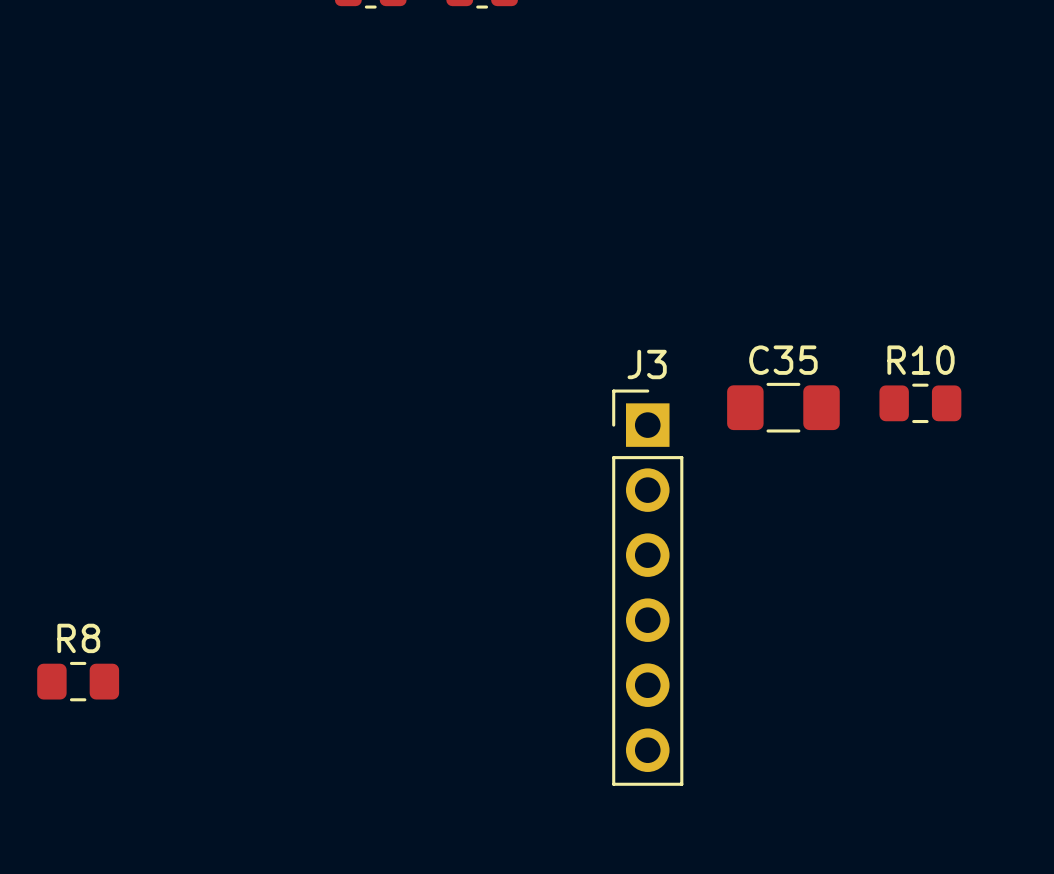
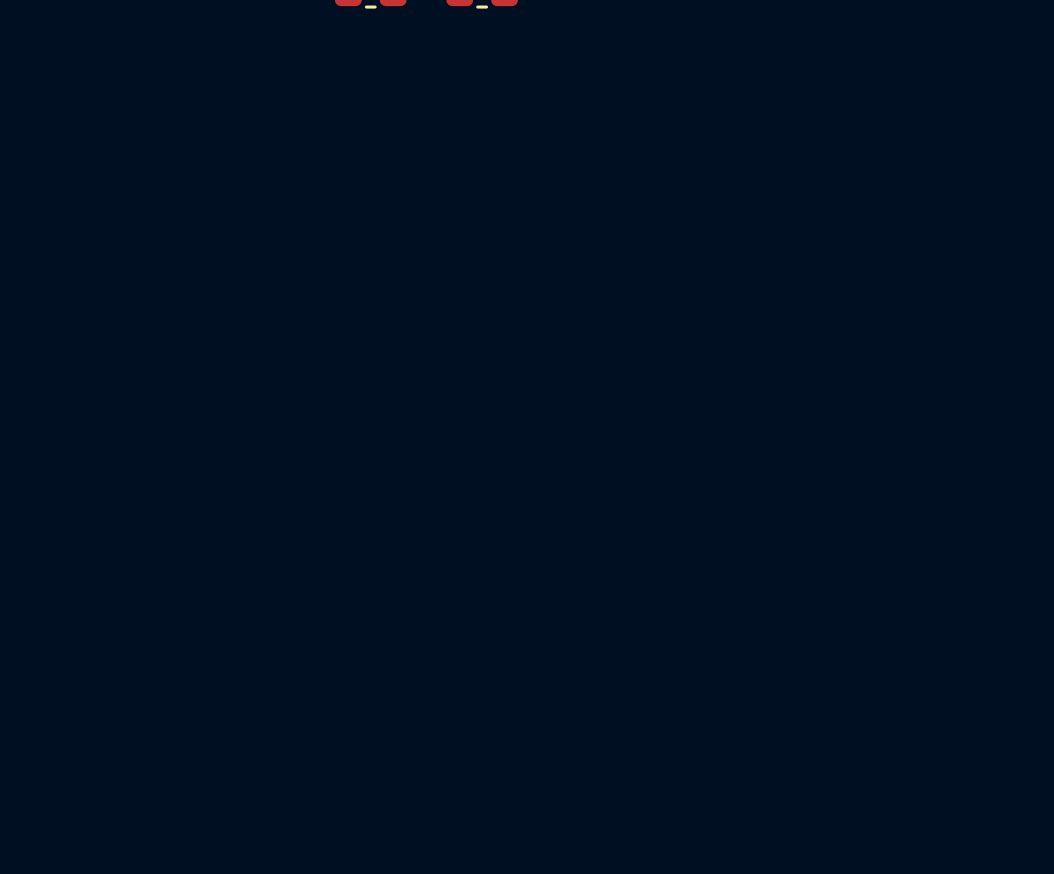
R10: (920, 403) -> none
C35: (783, 407) -> none
J3: (647, 587) -> none
R8: (78, 681) -> none

